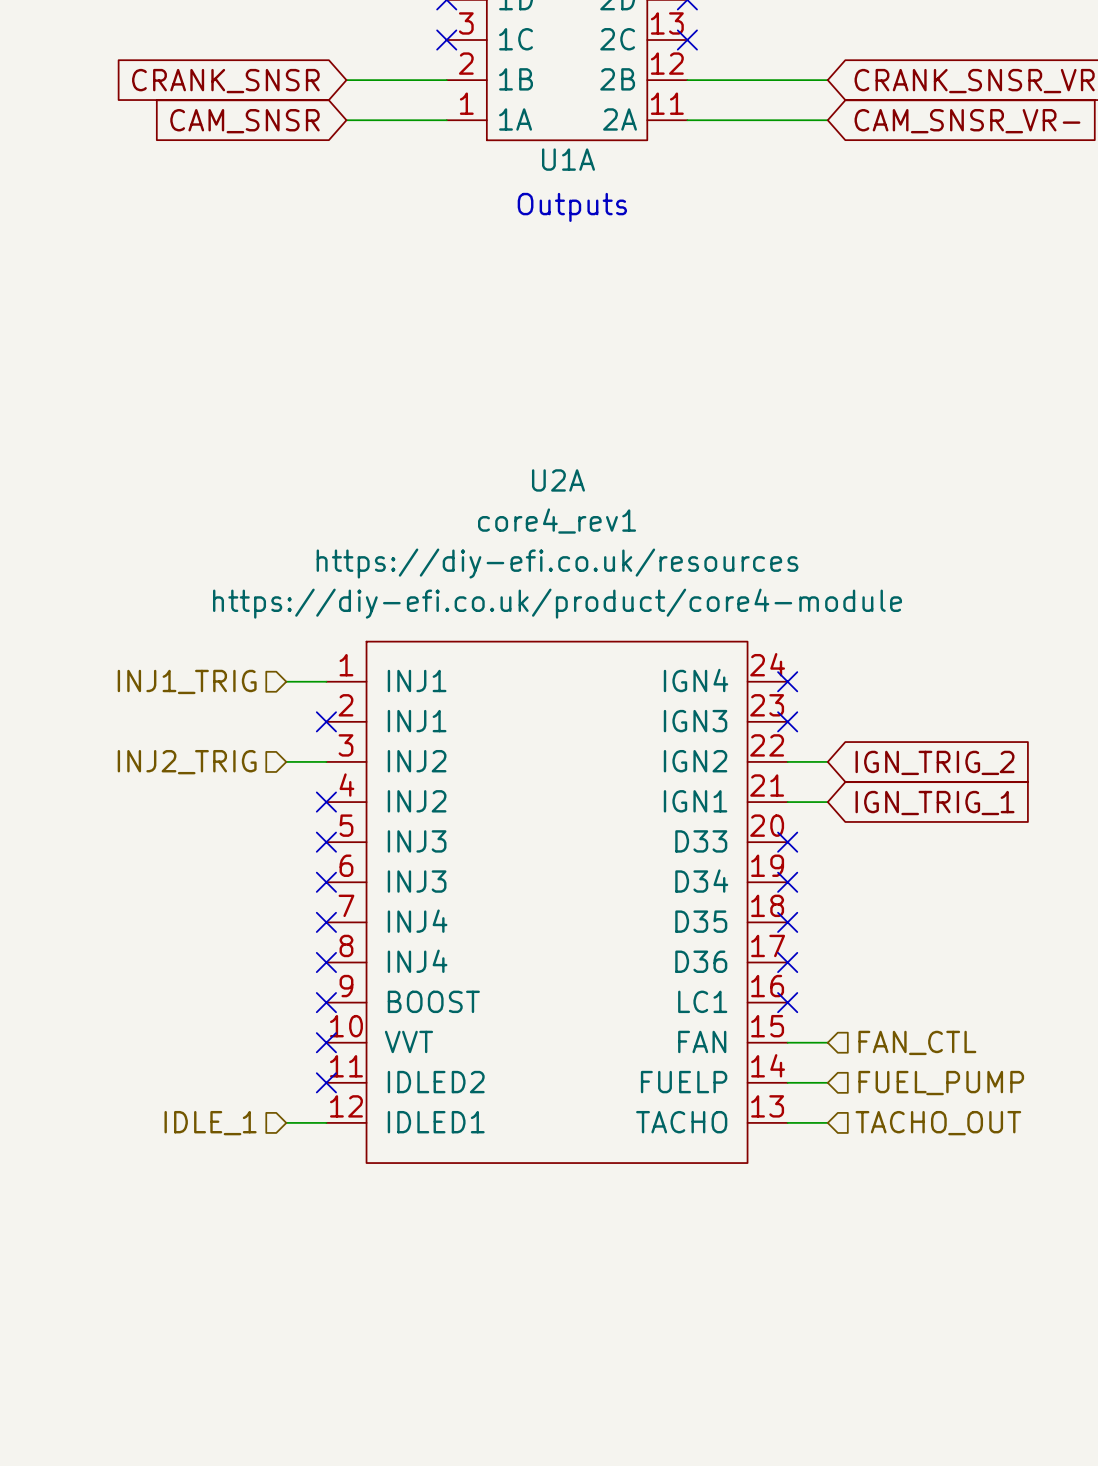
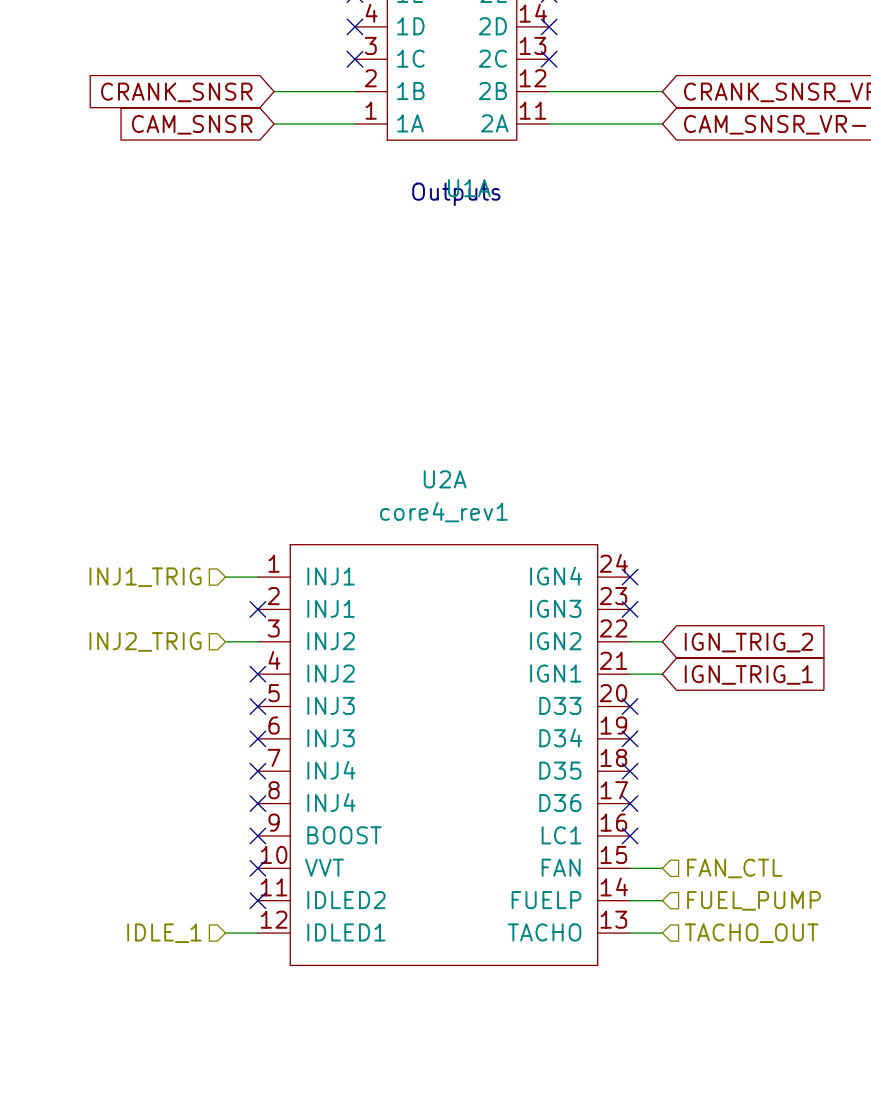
U1A name position: U1A (568, 159) -> U1A (469, 188)
U2A name position: U2A (558, 480) -> U2A (445, 479)
U2A value position: core4_rev1 (557, 521) -> core4_rev1 (443, 512)
U2A text: https://diy-efi.co.uk/resources (557, 563) -> none
U2A text: https://diy-efi.co.uk/product/core4-module (557, 603) -> none

